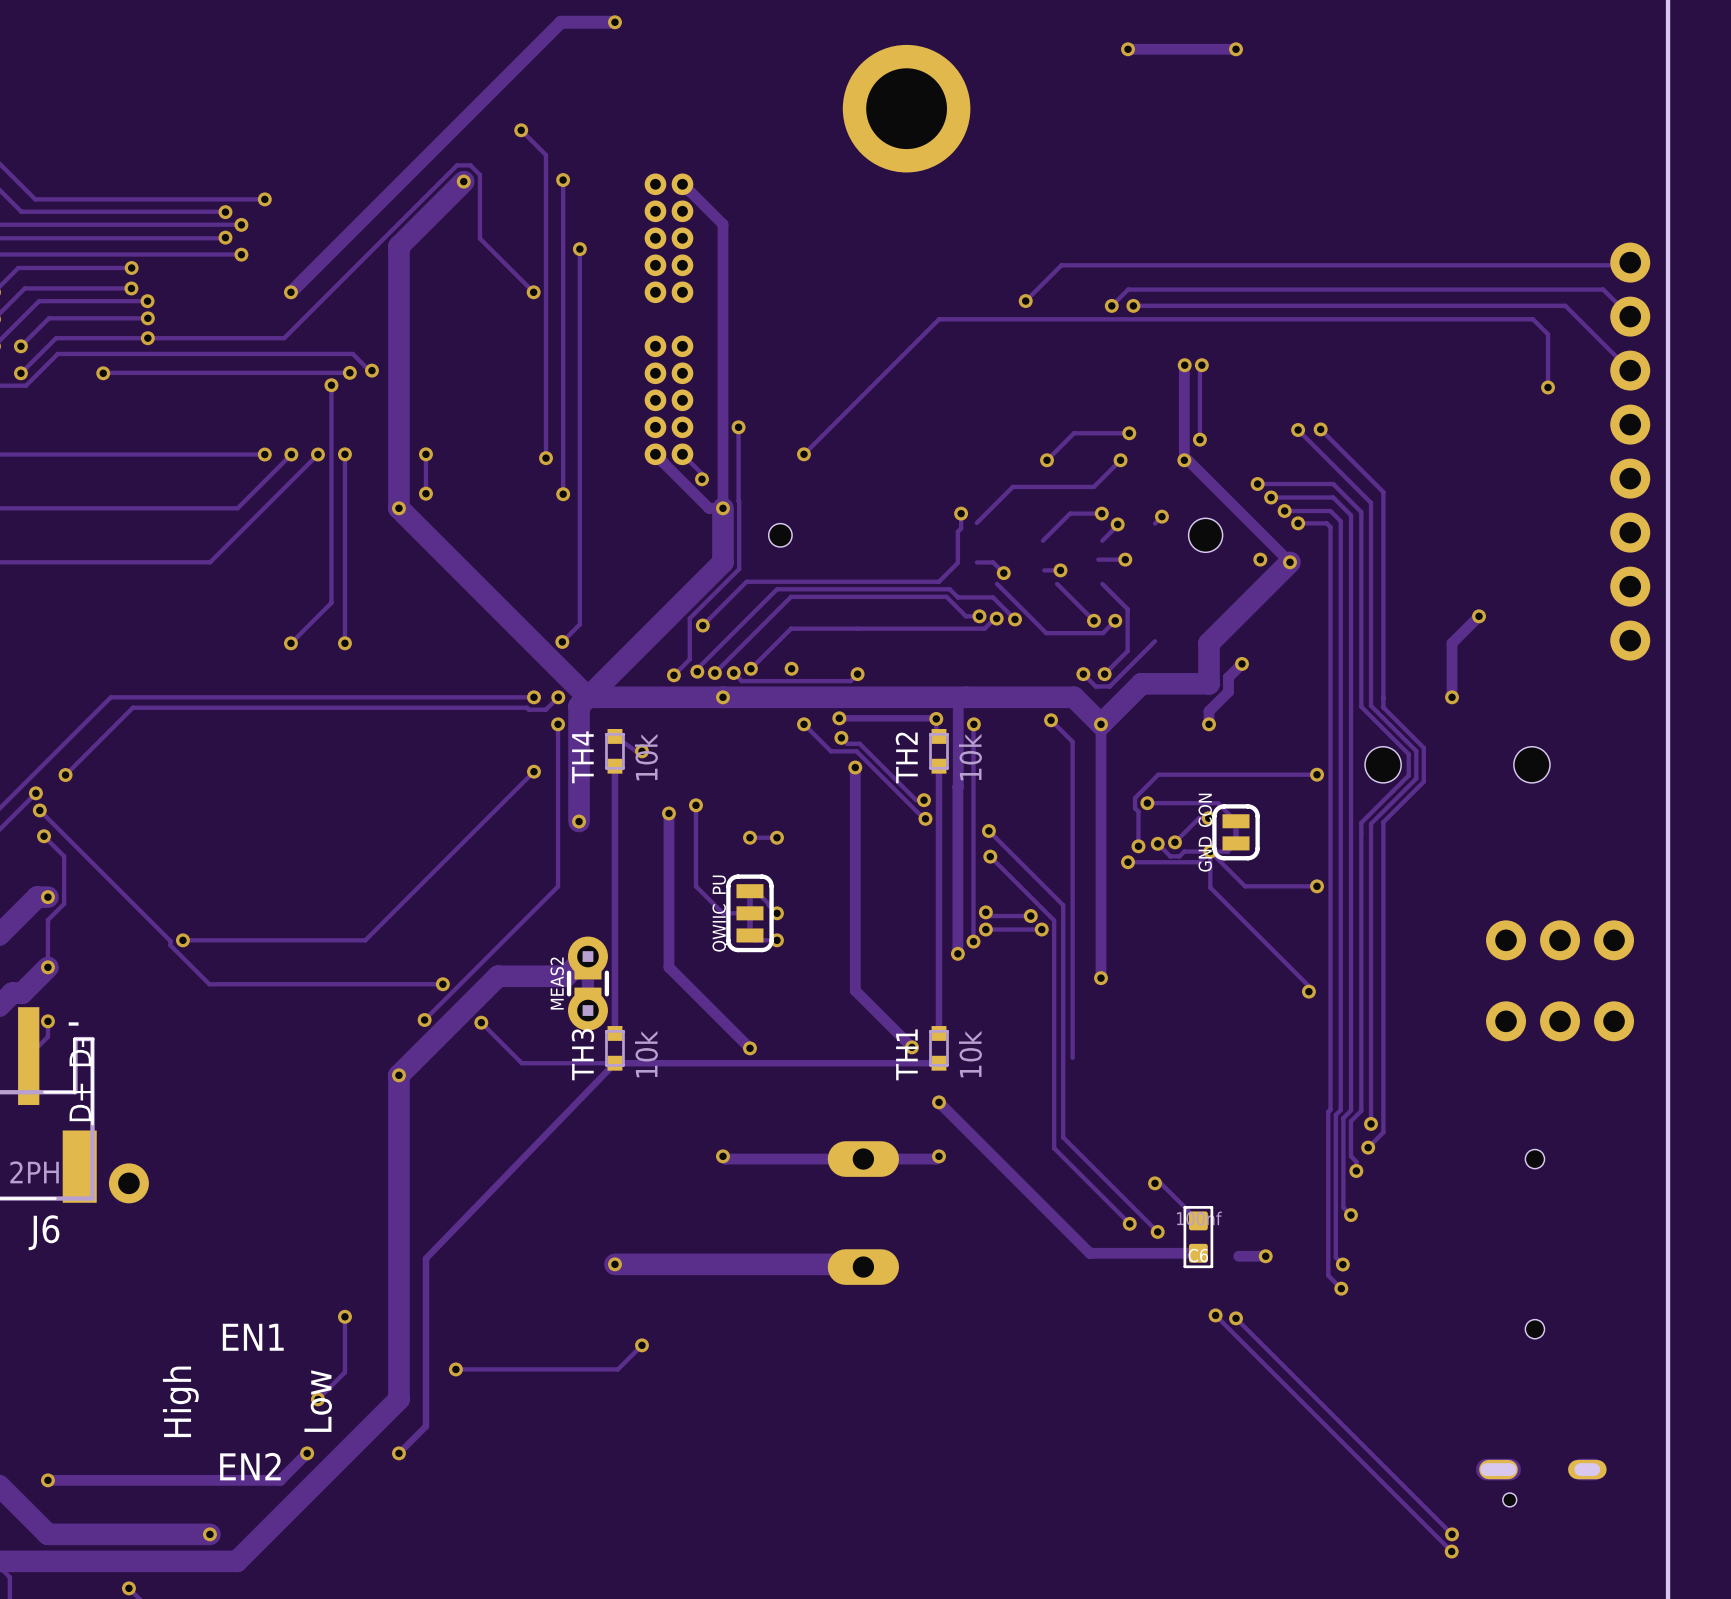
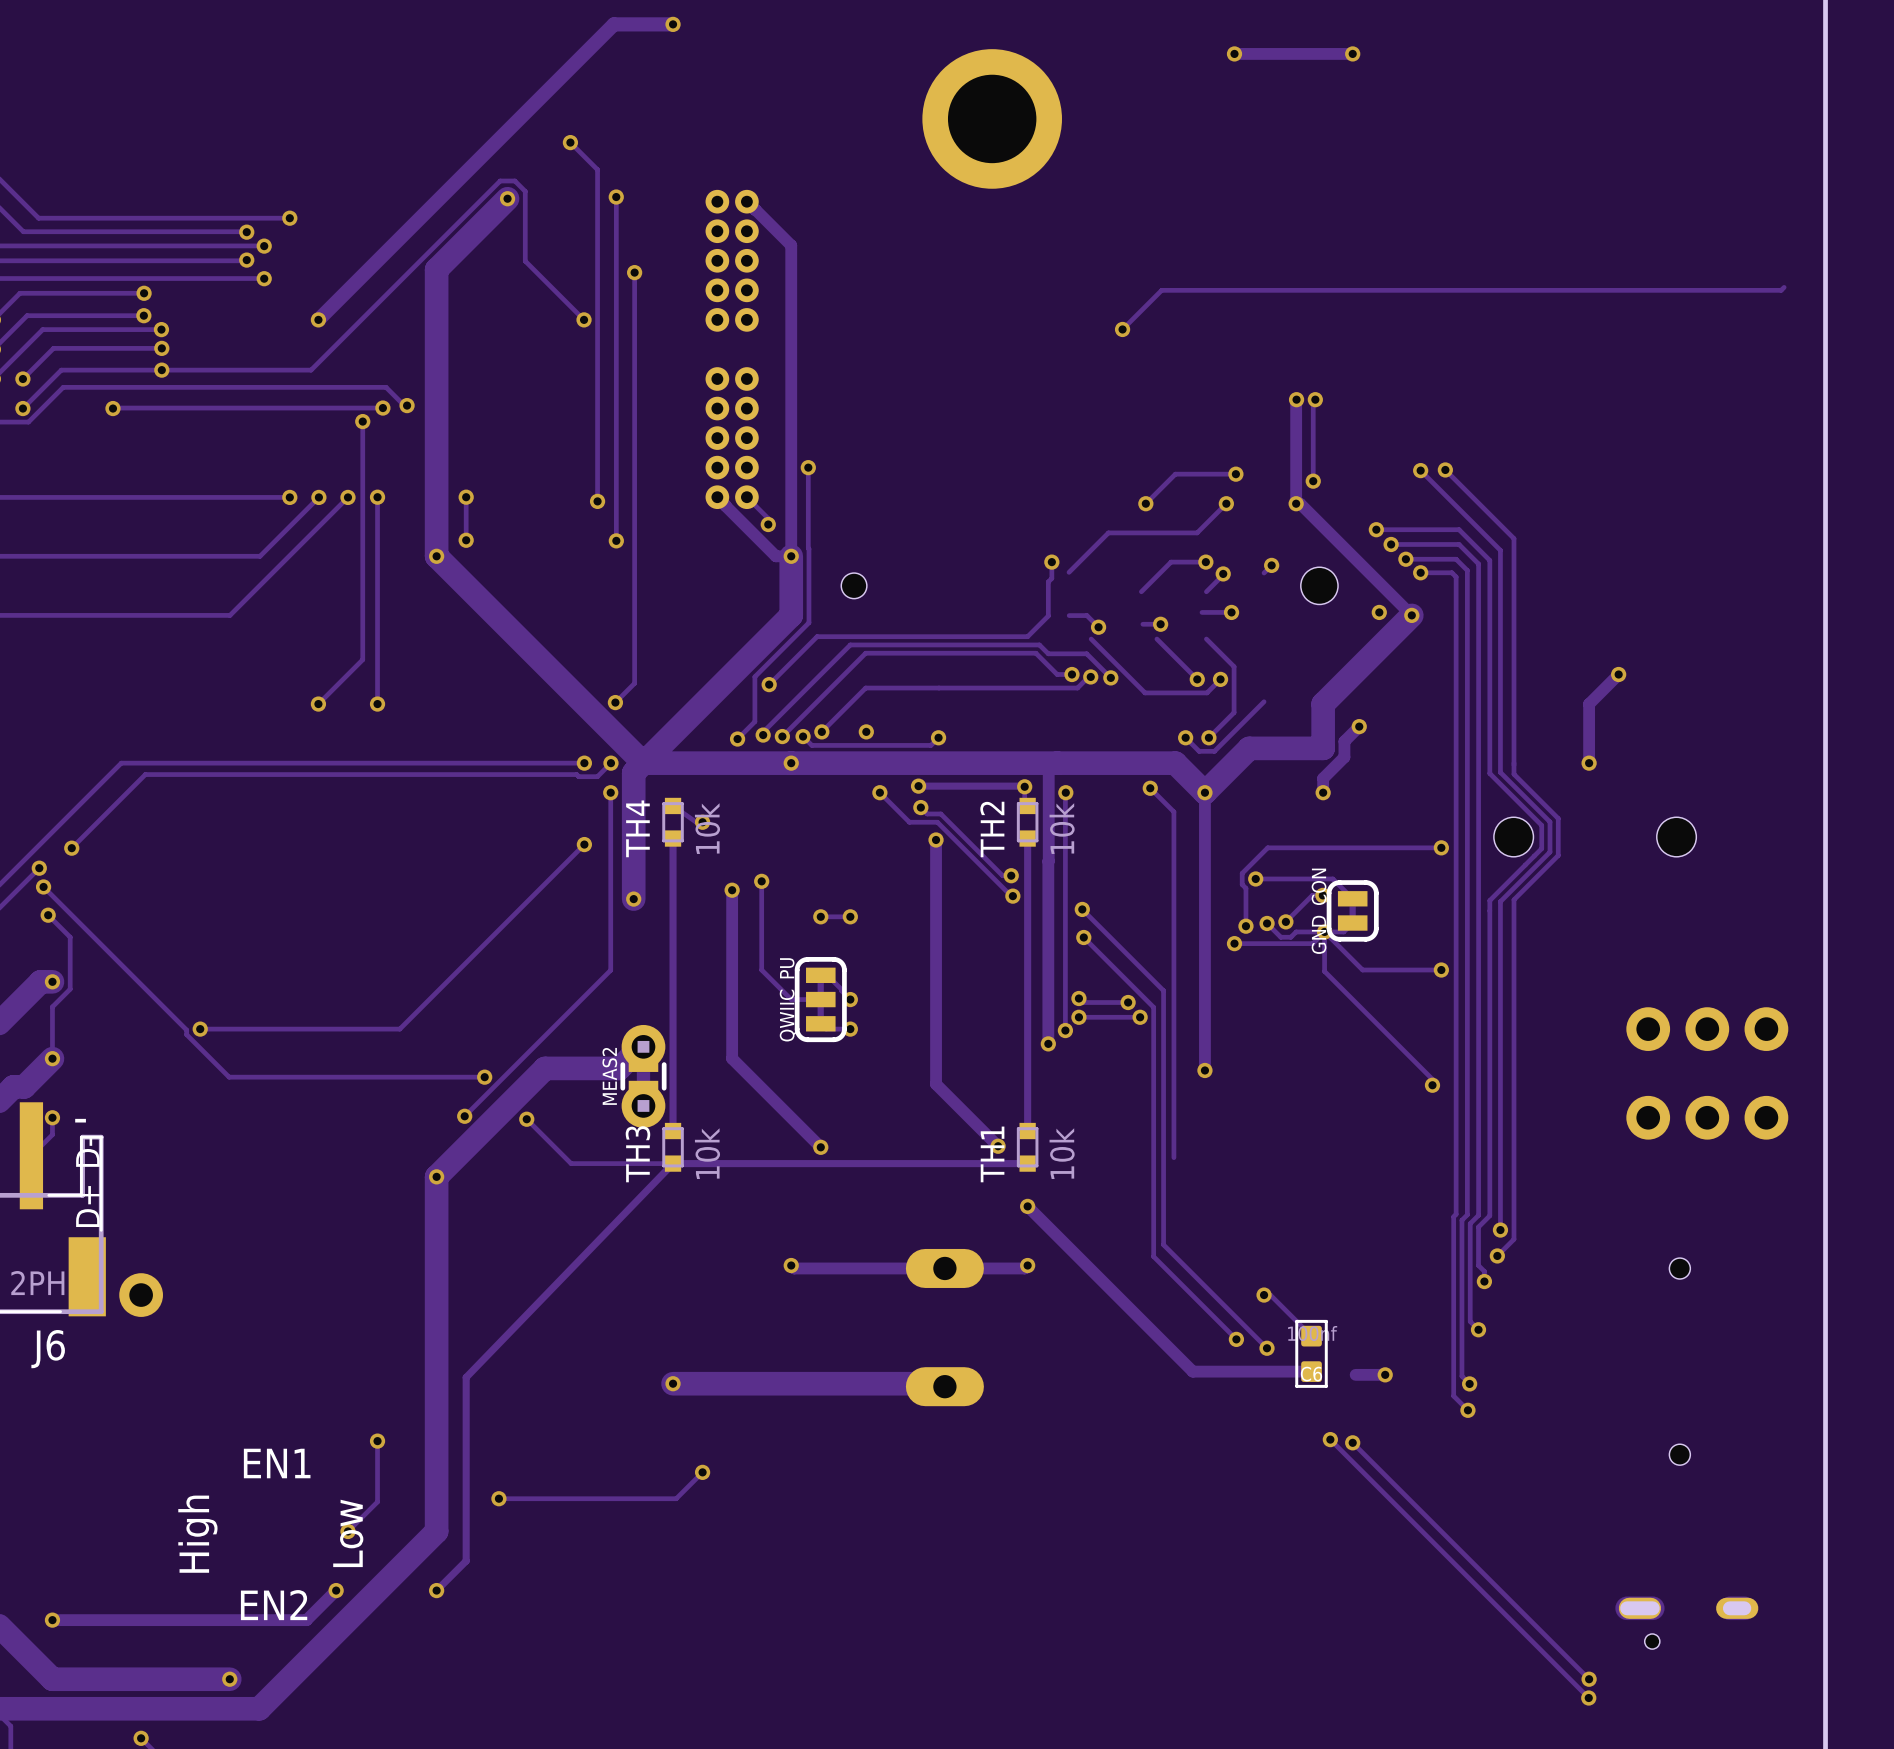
track: (1111, 305) (1128, 289) (1603, 289) (1630, 316) -> none
via: (1111, 305) -> none
track: (1133, 305) (1565, 305) (1630, 370) -> none
via: (1133, 305) -> none
track: (1548, 387) (1548, 334) (1533, 319) (938, 319) (803, 454) -> none
via: (1548, 387) -> none
part: (1630, 451) -> none
via: (803, 454) -> none

